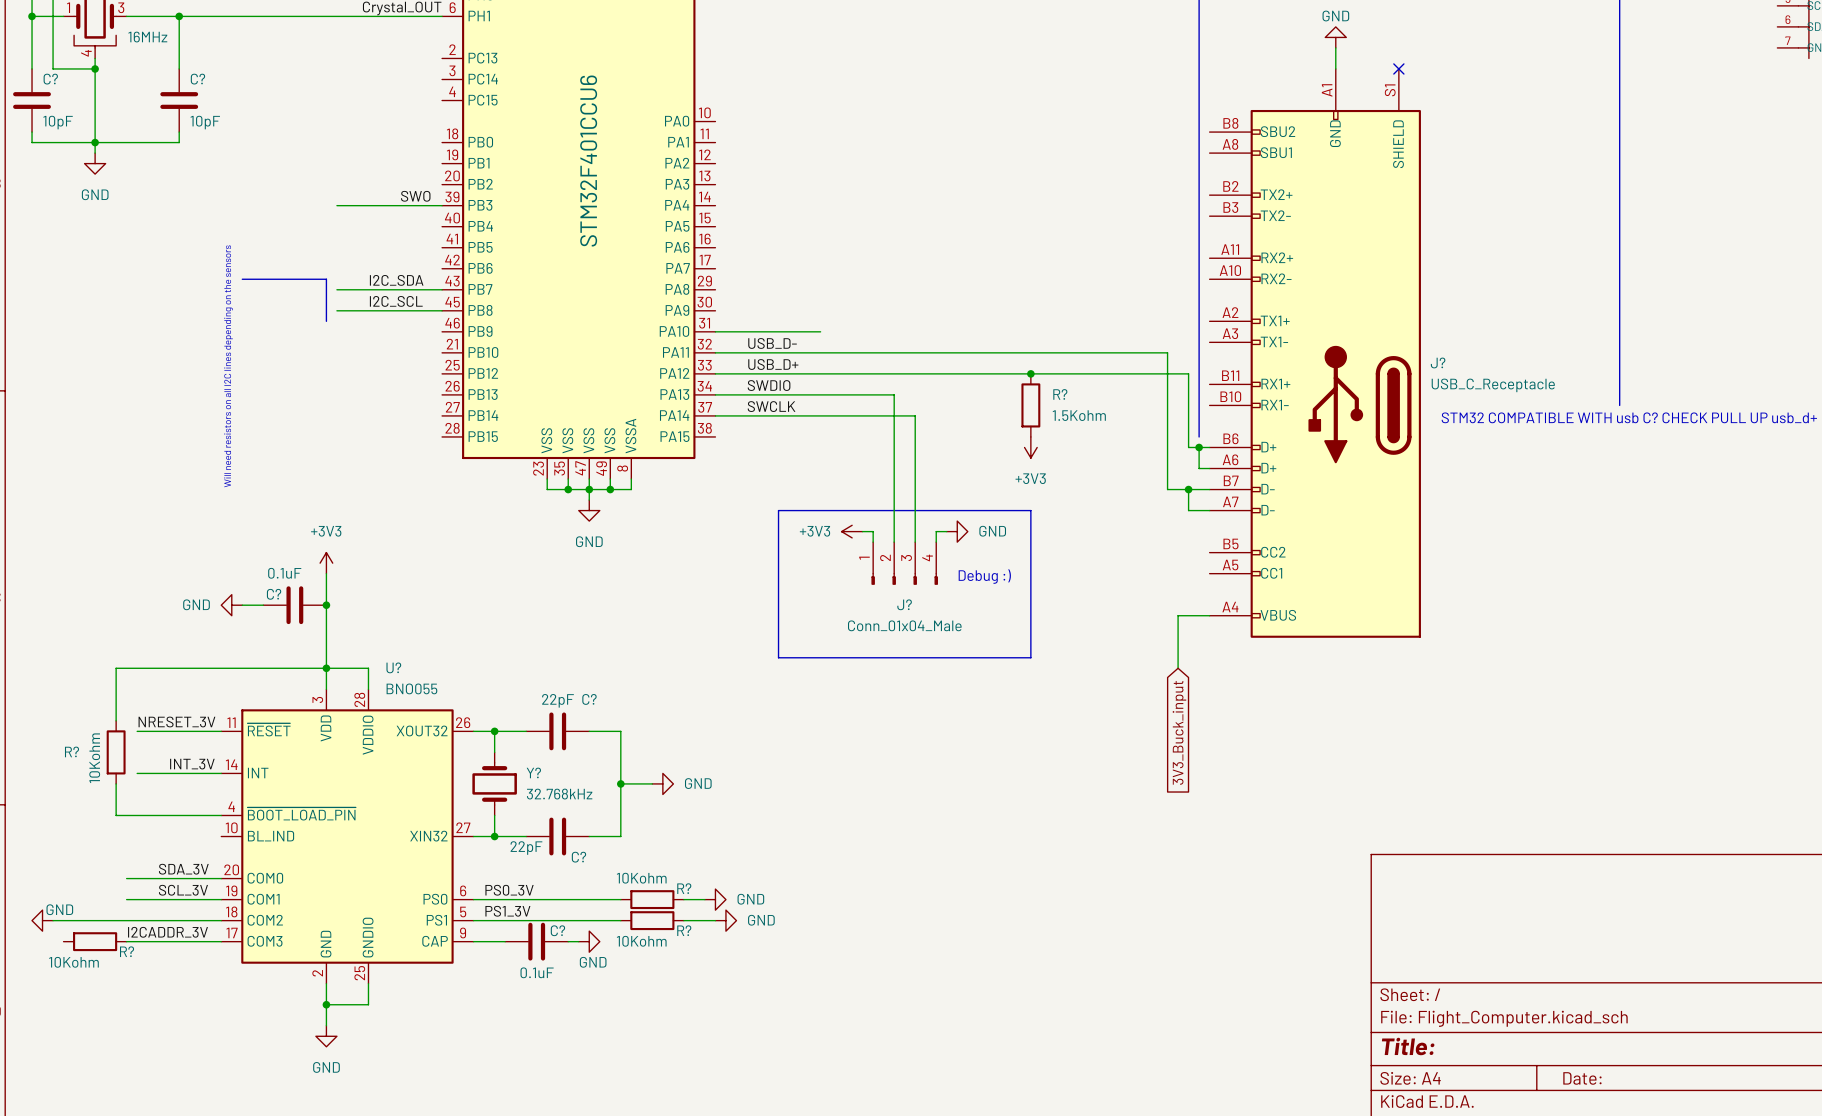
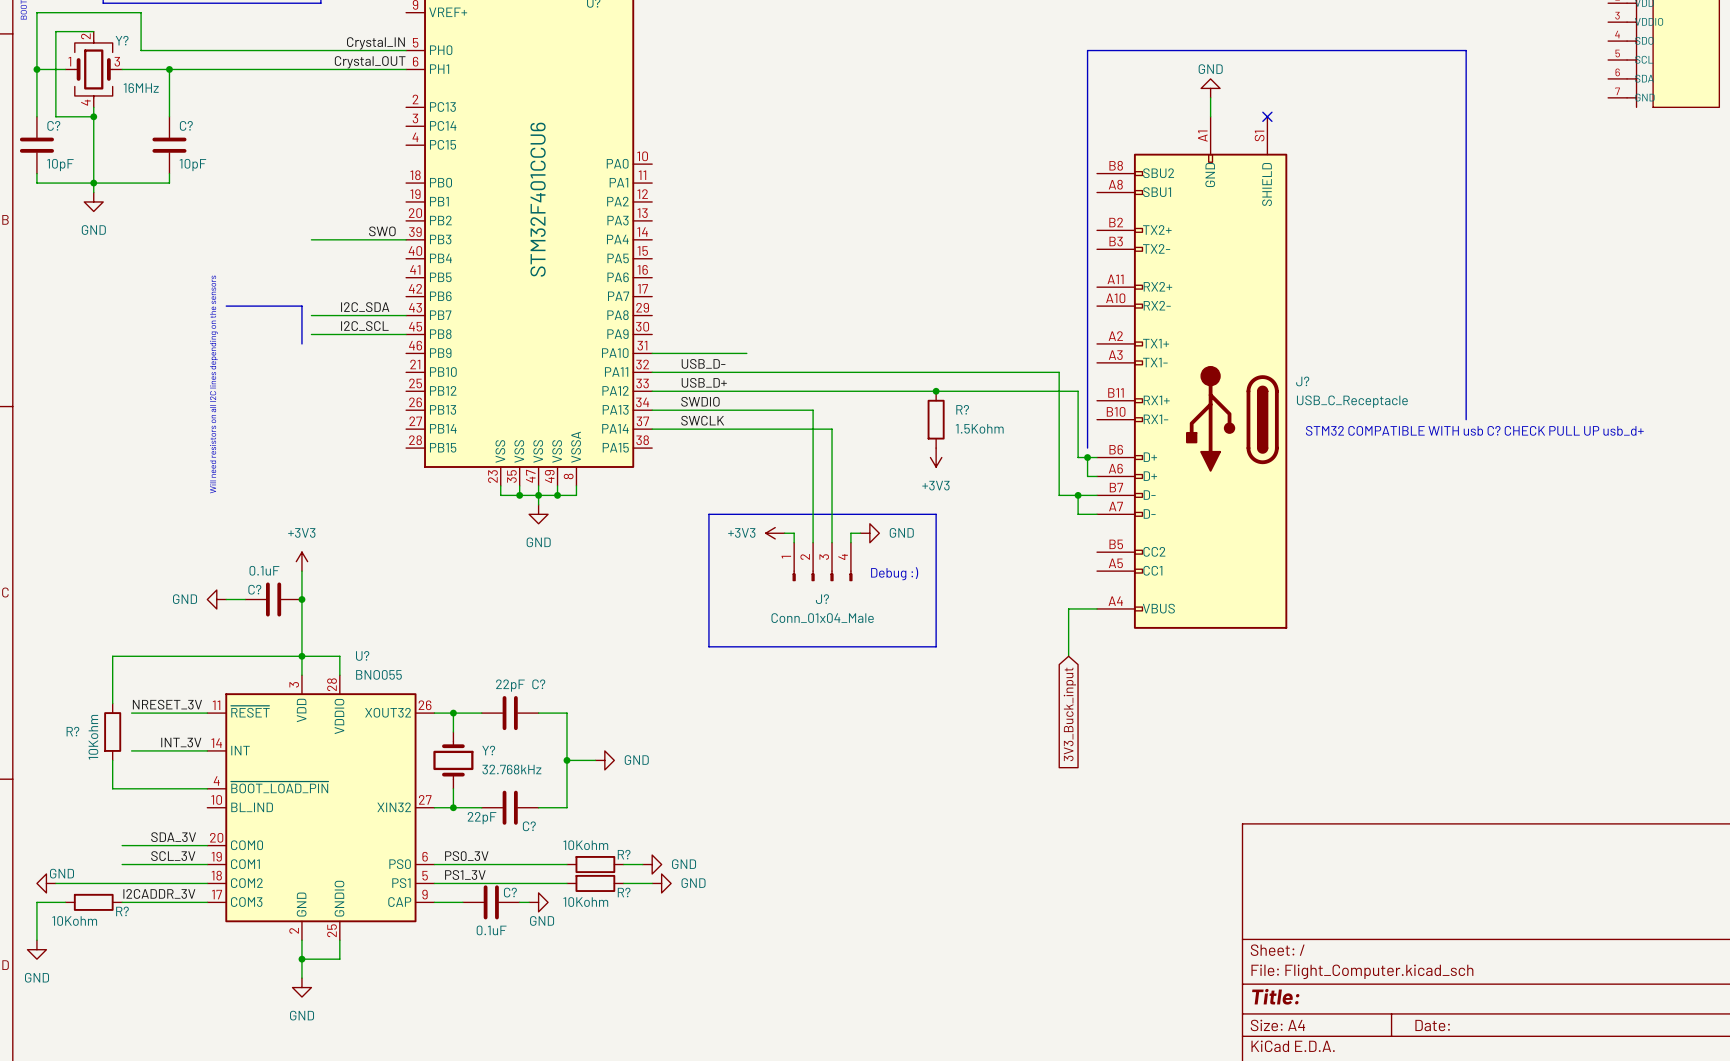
wire: none -> (65, 902) (36, 902) (36, 940)
power symbol: none -> GND (36, 949)

